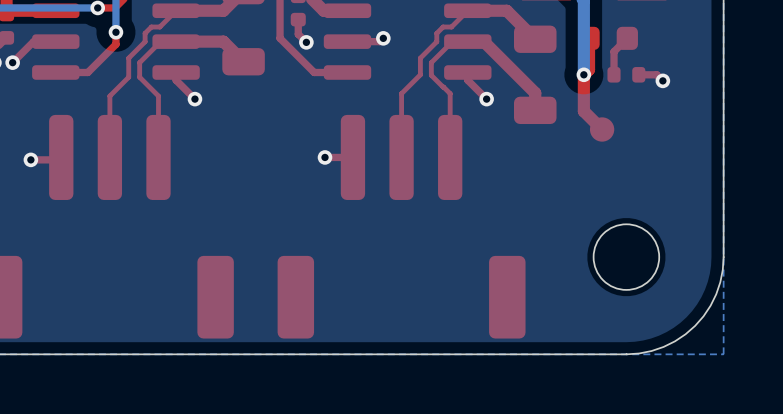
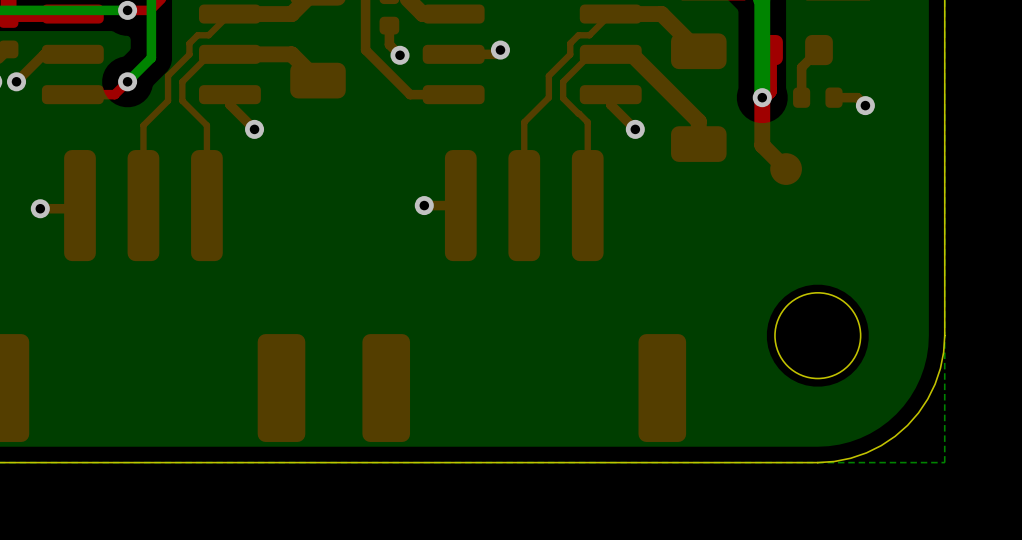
top track: (115, 32) (115, 44) (97, 62) -> none
bottom track: none -> (151, 42) (151, 57) (127, 81)
via position: (115, 32) -> (127, 81)

